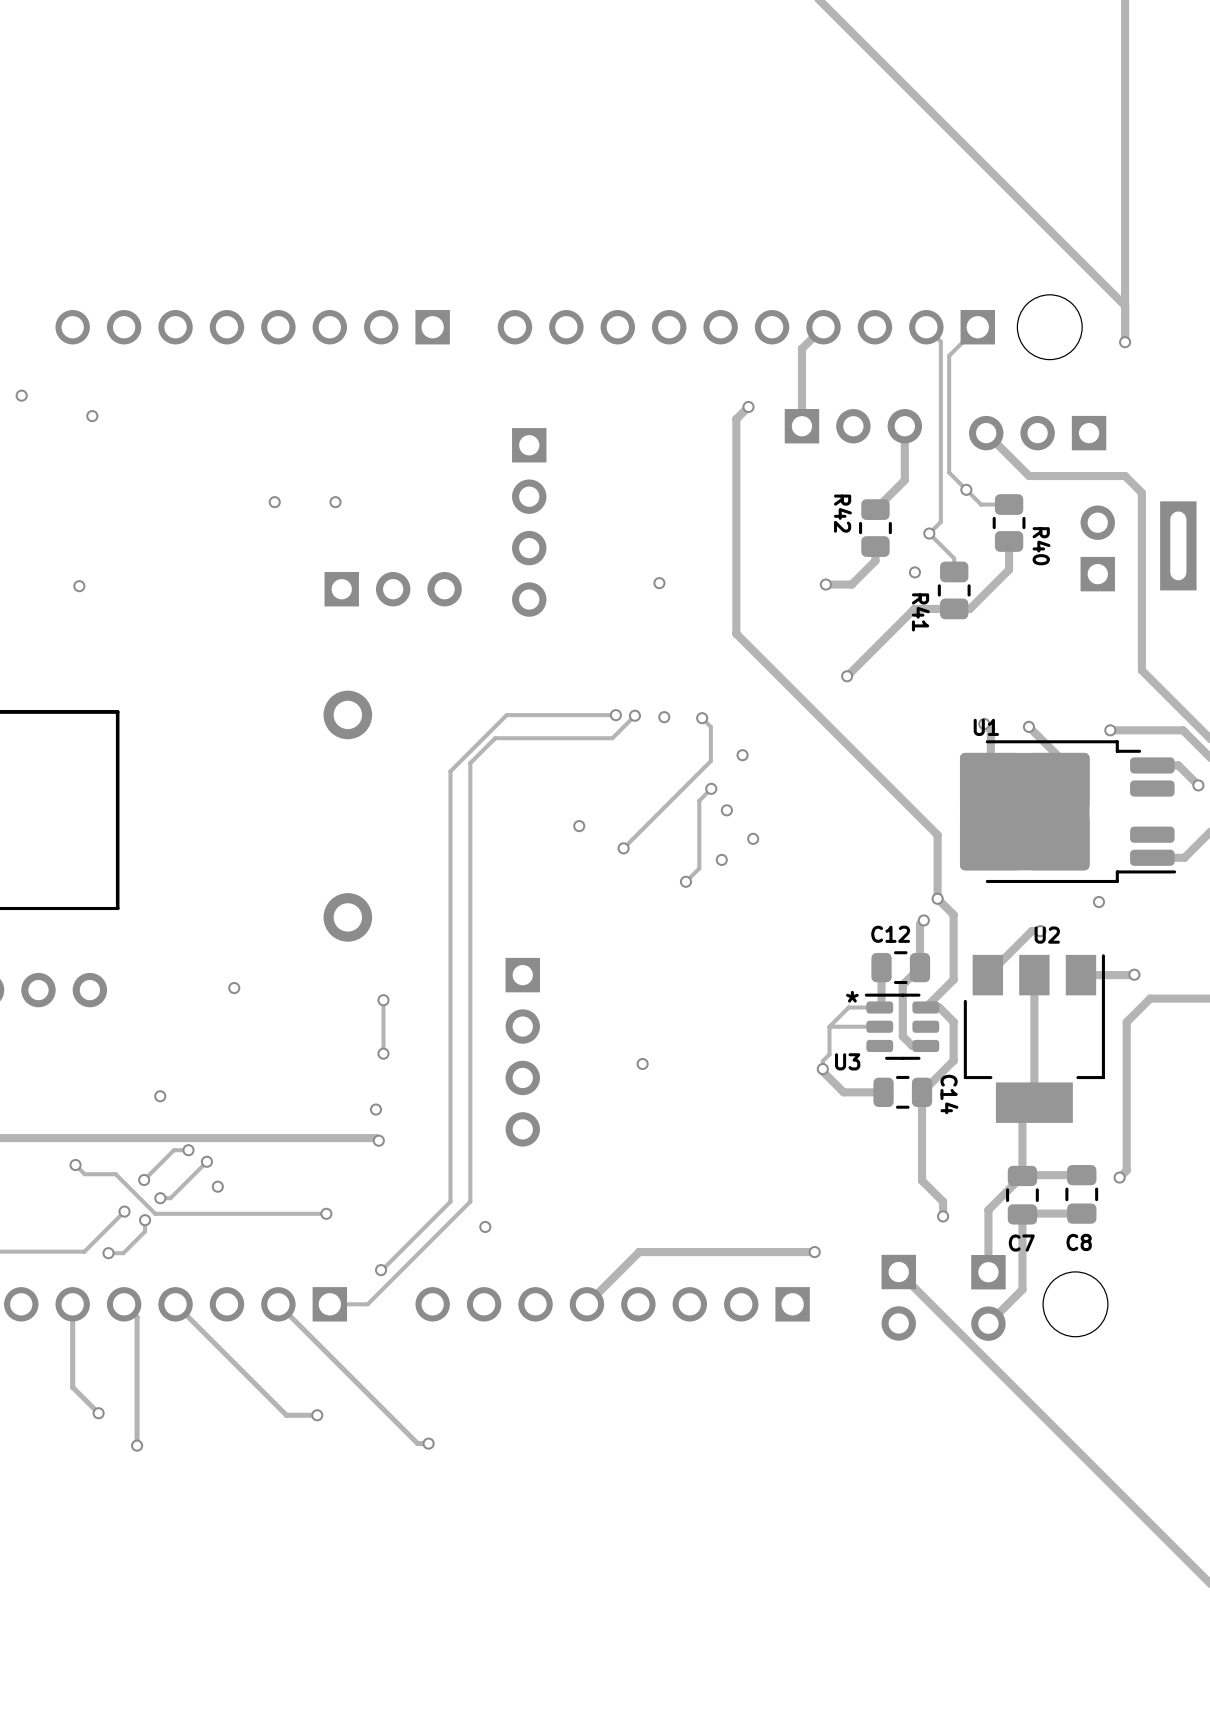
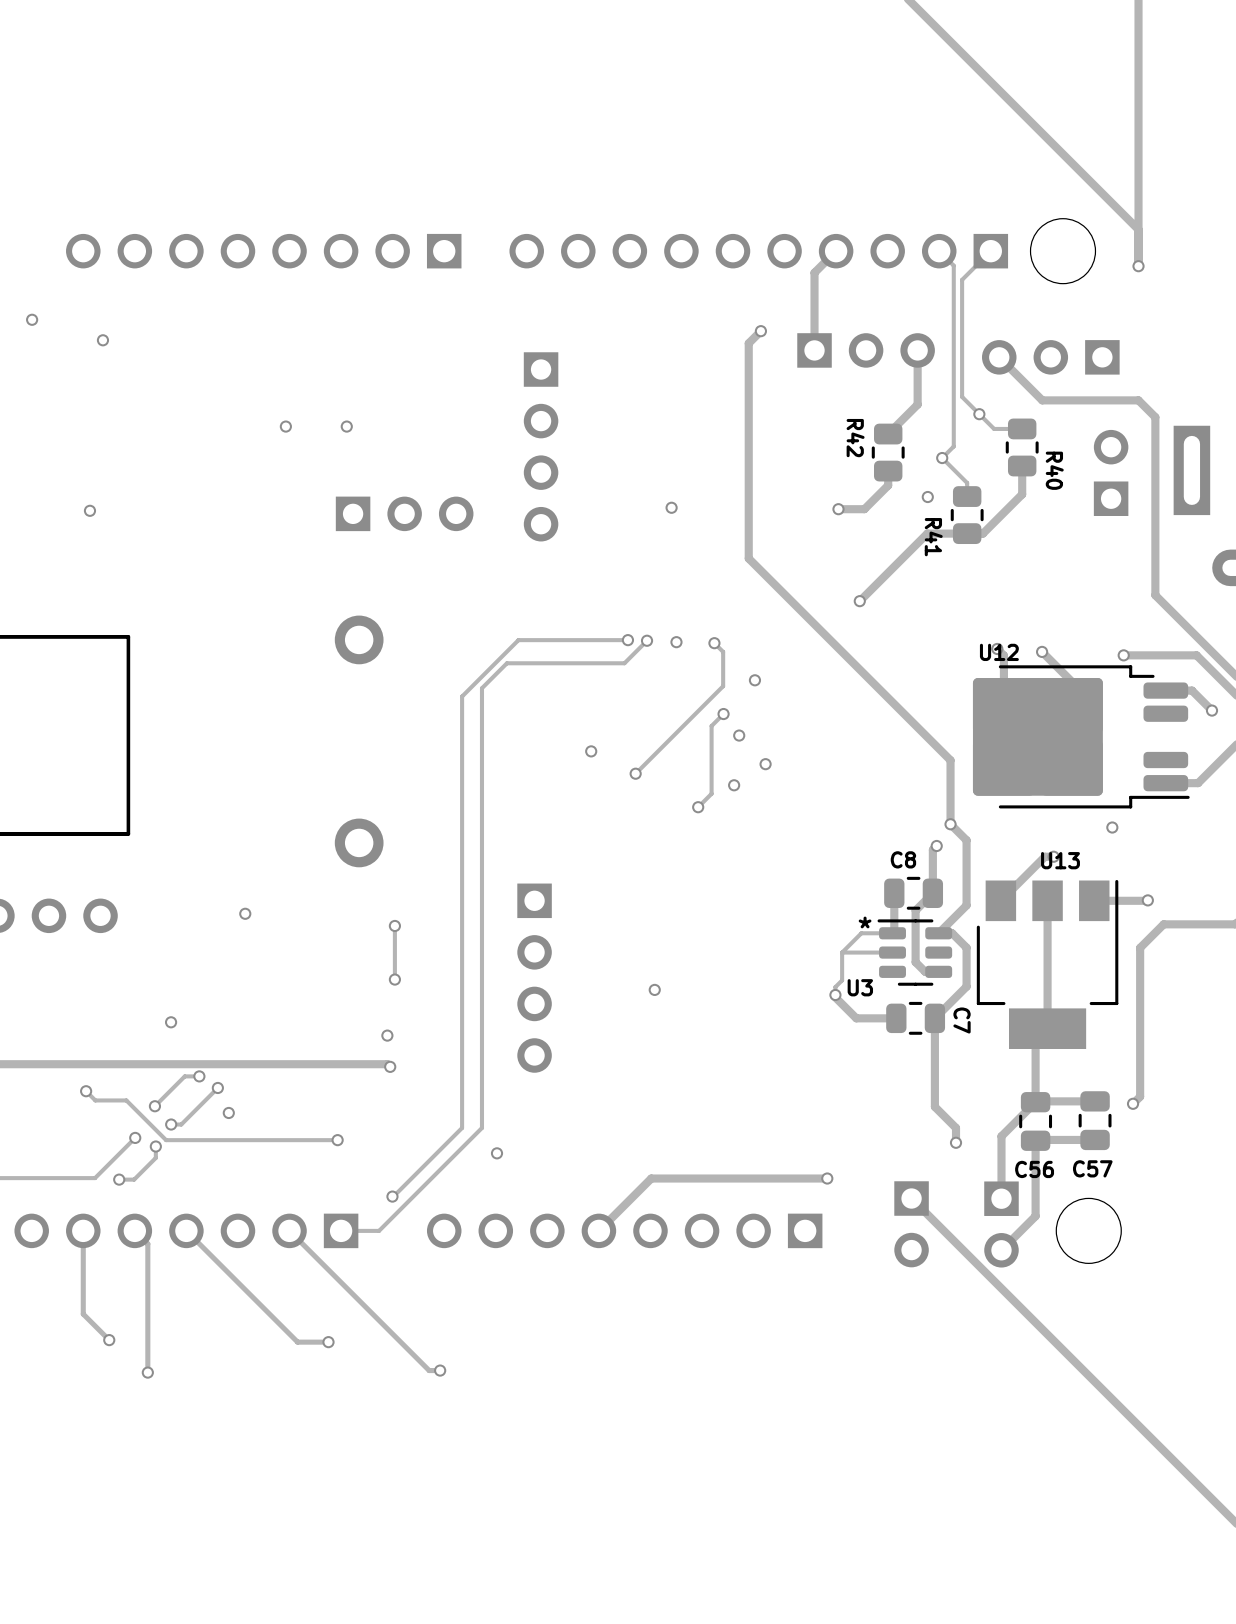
U1 name: U1 (986, 727) -> U12 (999, 652)
C12 name: C12 (890, 934) -> C8 (903, 859)
U2 name: U2 (1047, 935) -> U13 (1060, 860)
C14 name: C14 (949, 1094) -> C7 (962, 1020)
C8 name: C8 (1079, 1242) -> C57 (1092, 1168)
C7 name: C7 (1021, 1243) -> C56 (1034, 1169)

